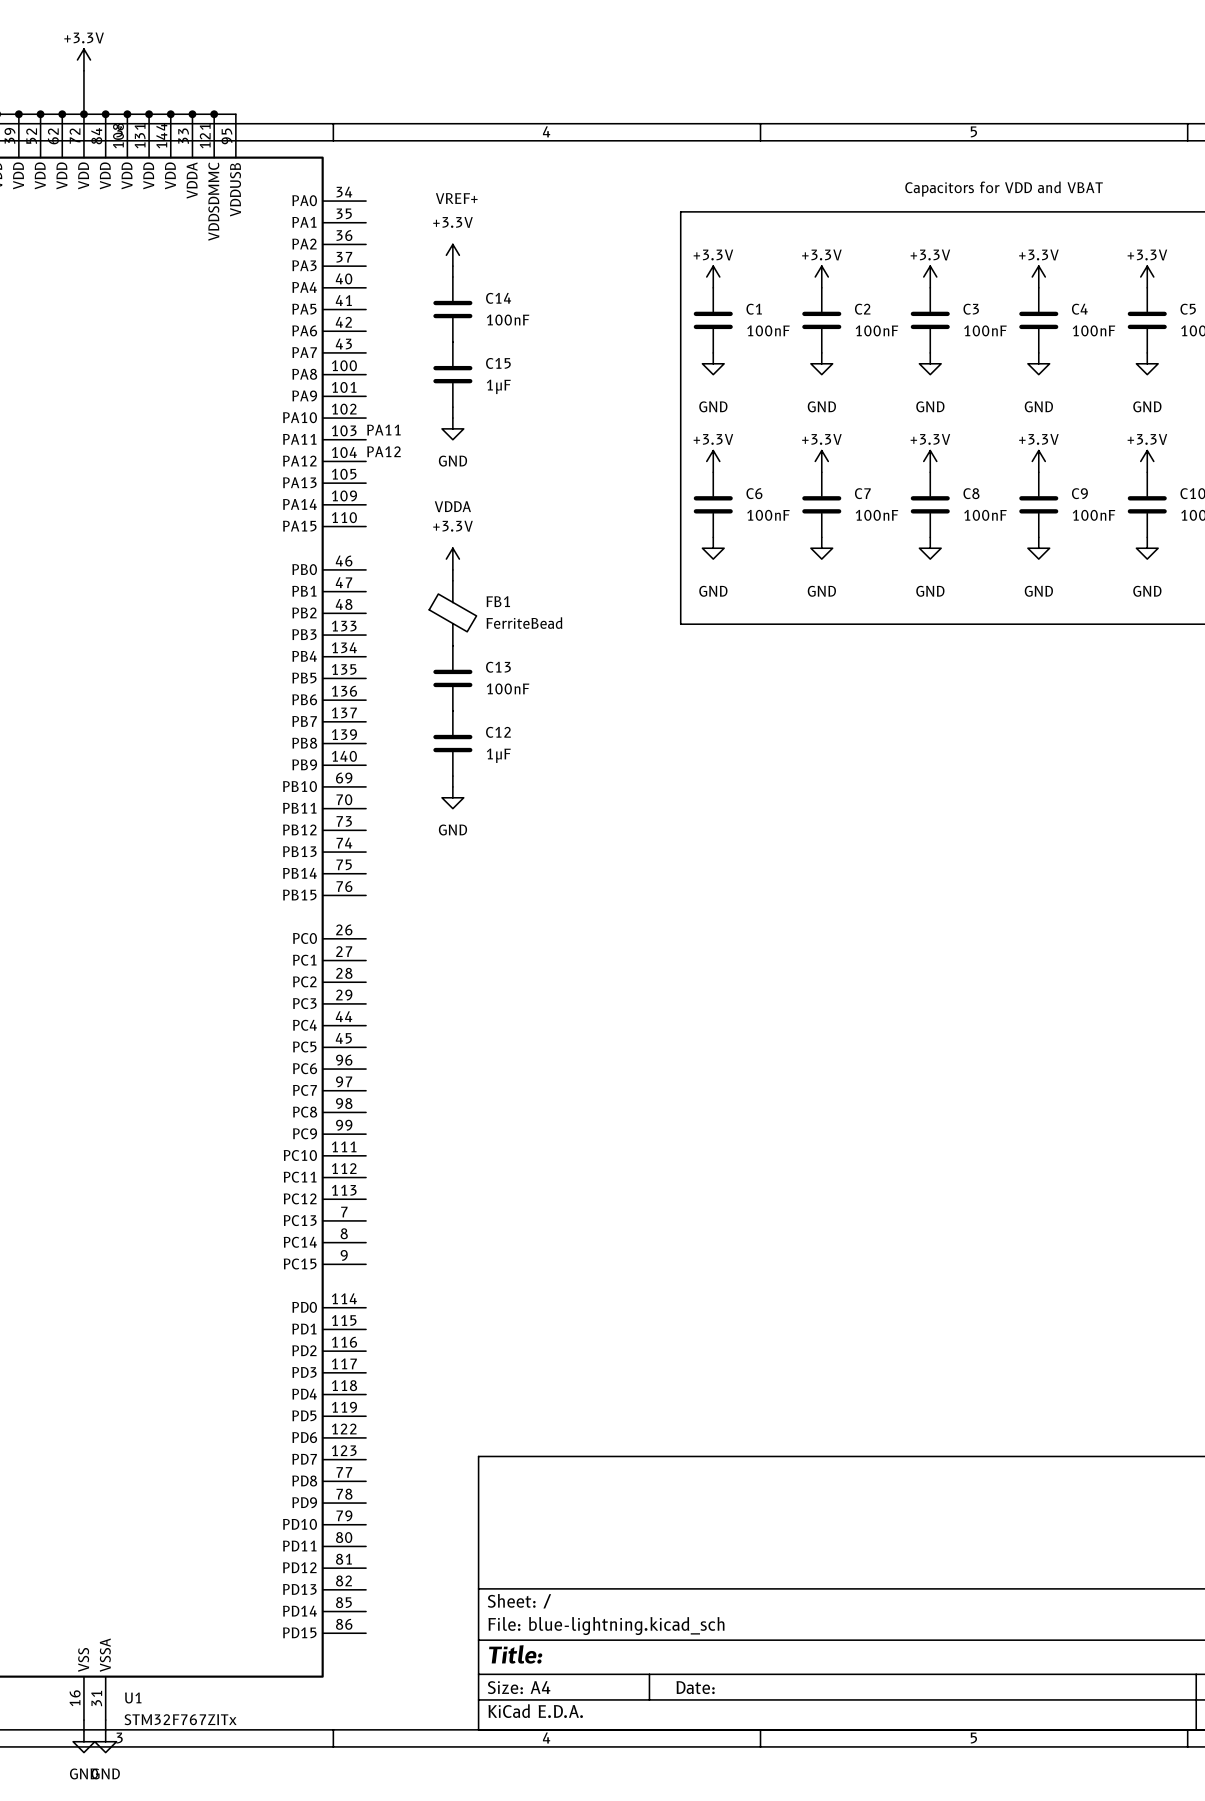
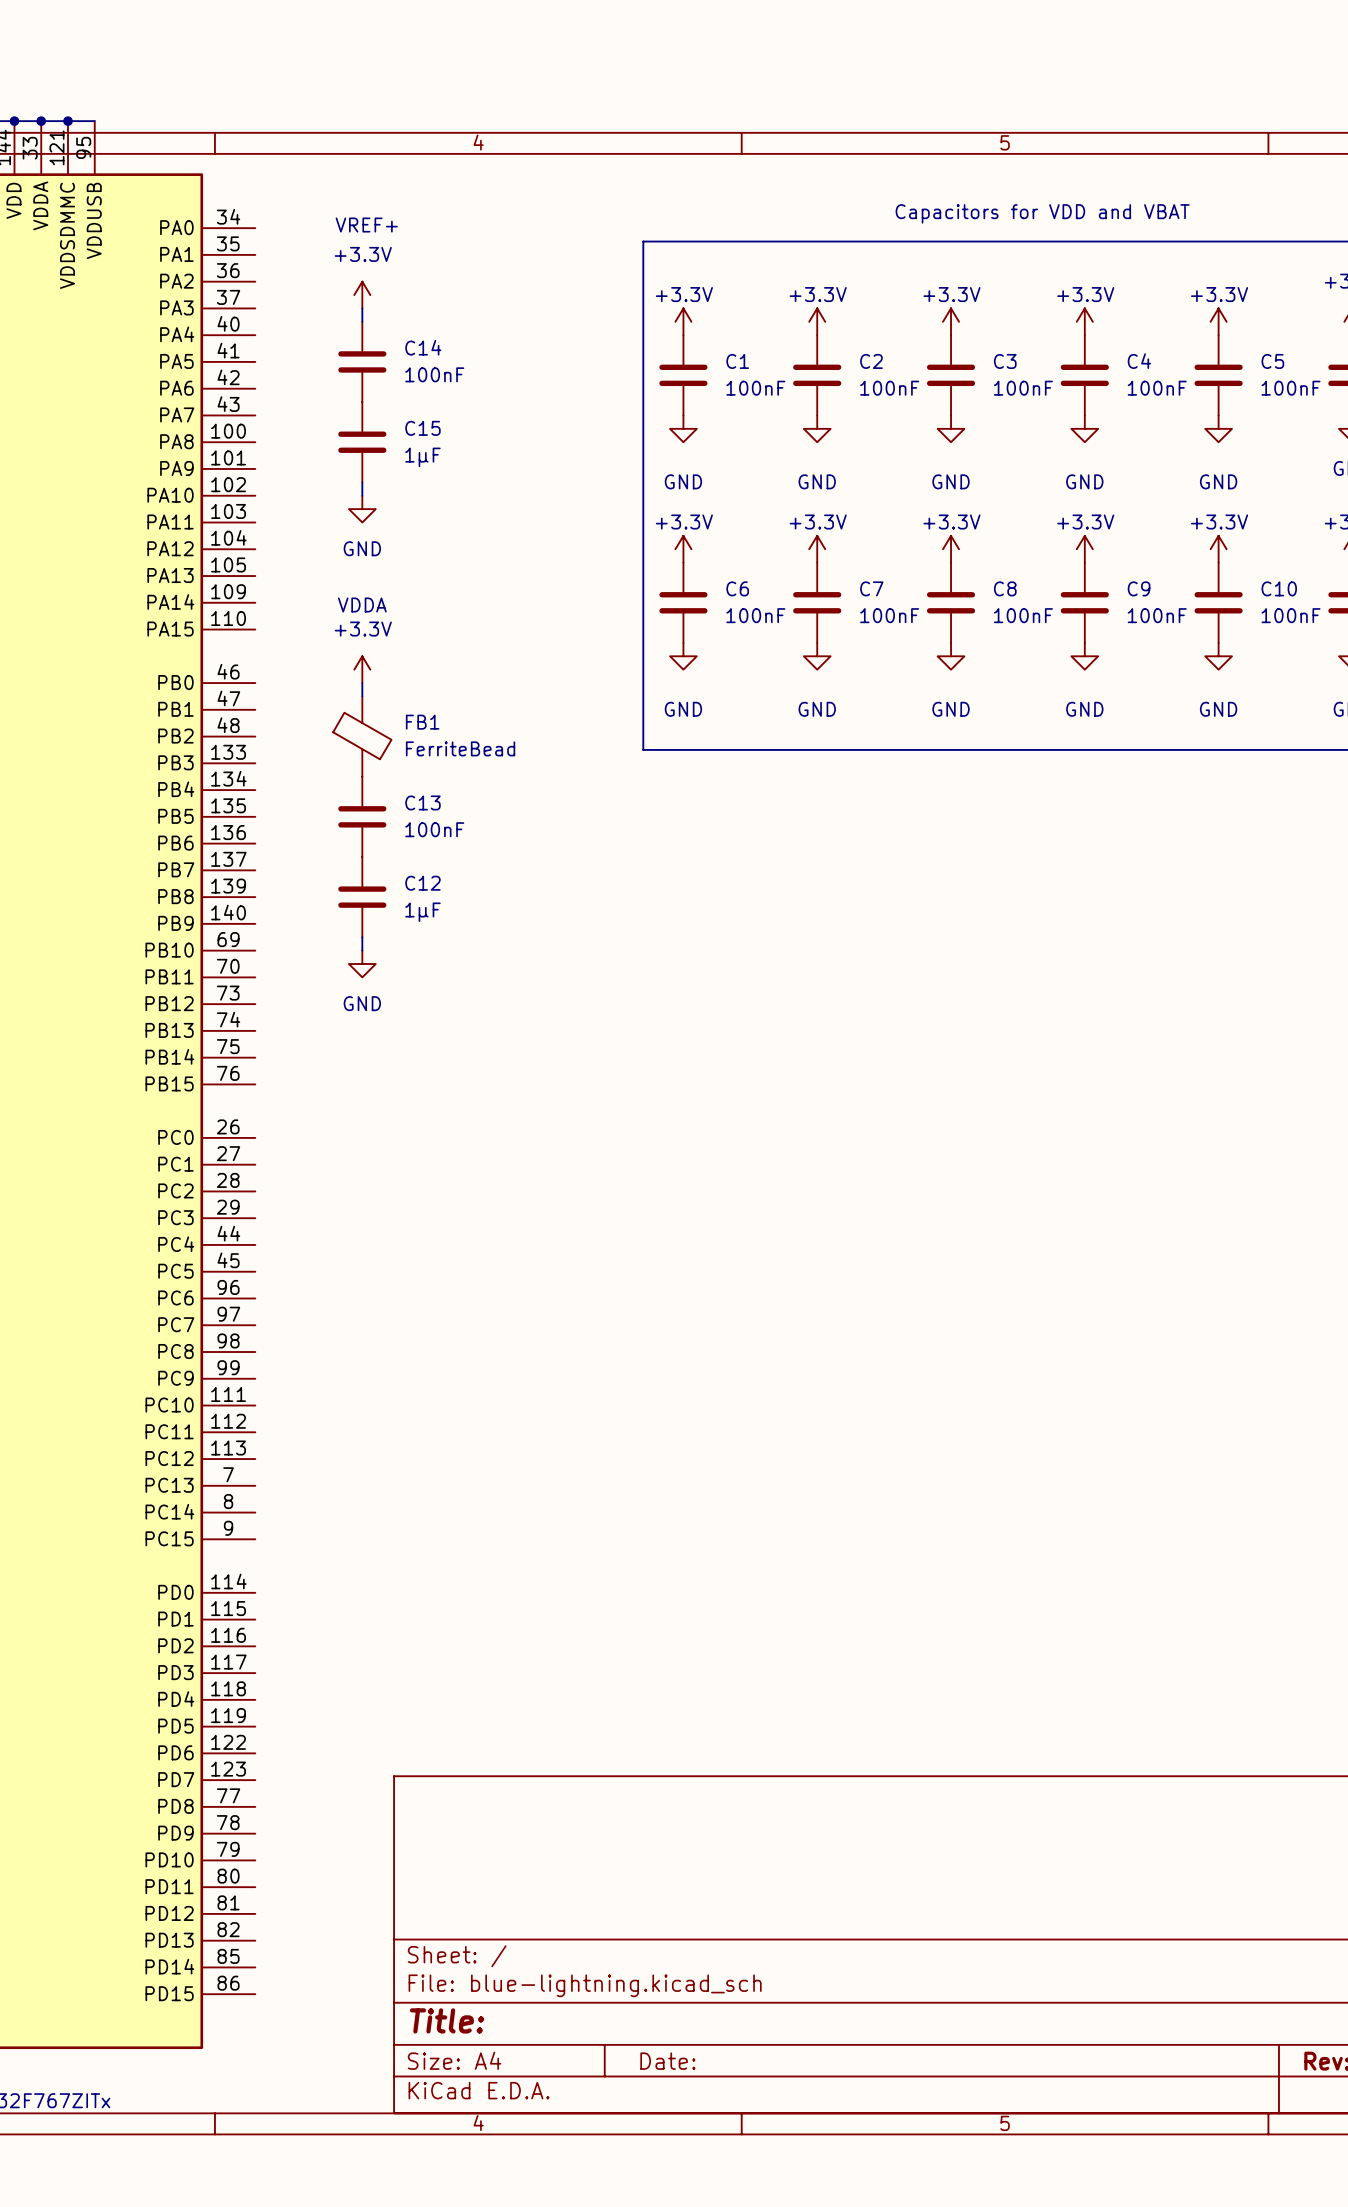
label: PA11 (383, 430) -> none
label: PA12 (383, 451) -> none

